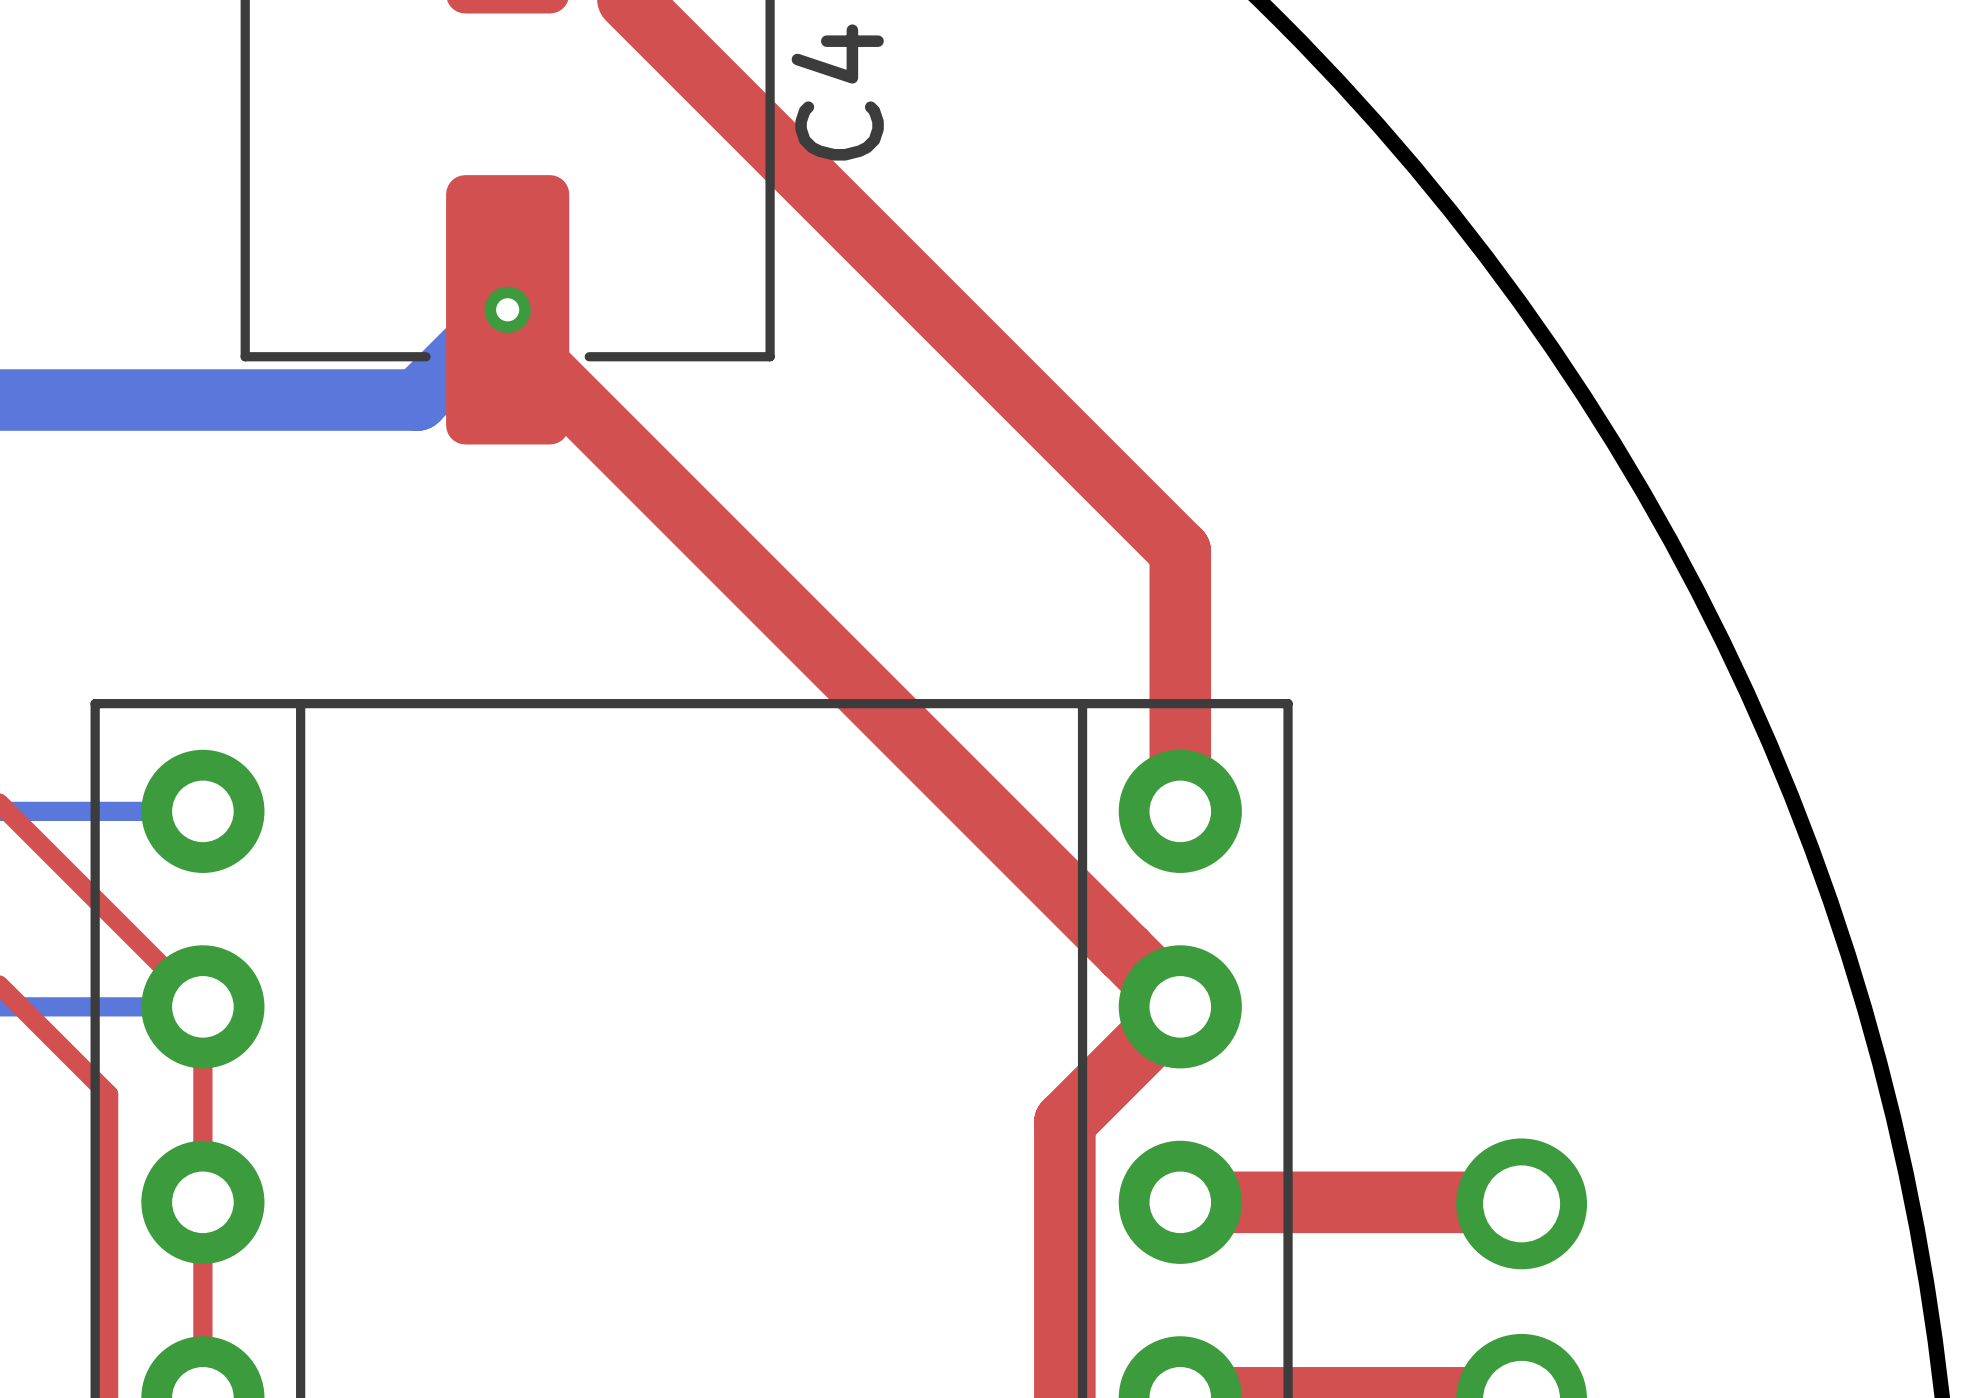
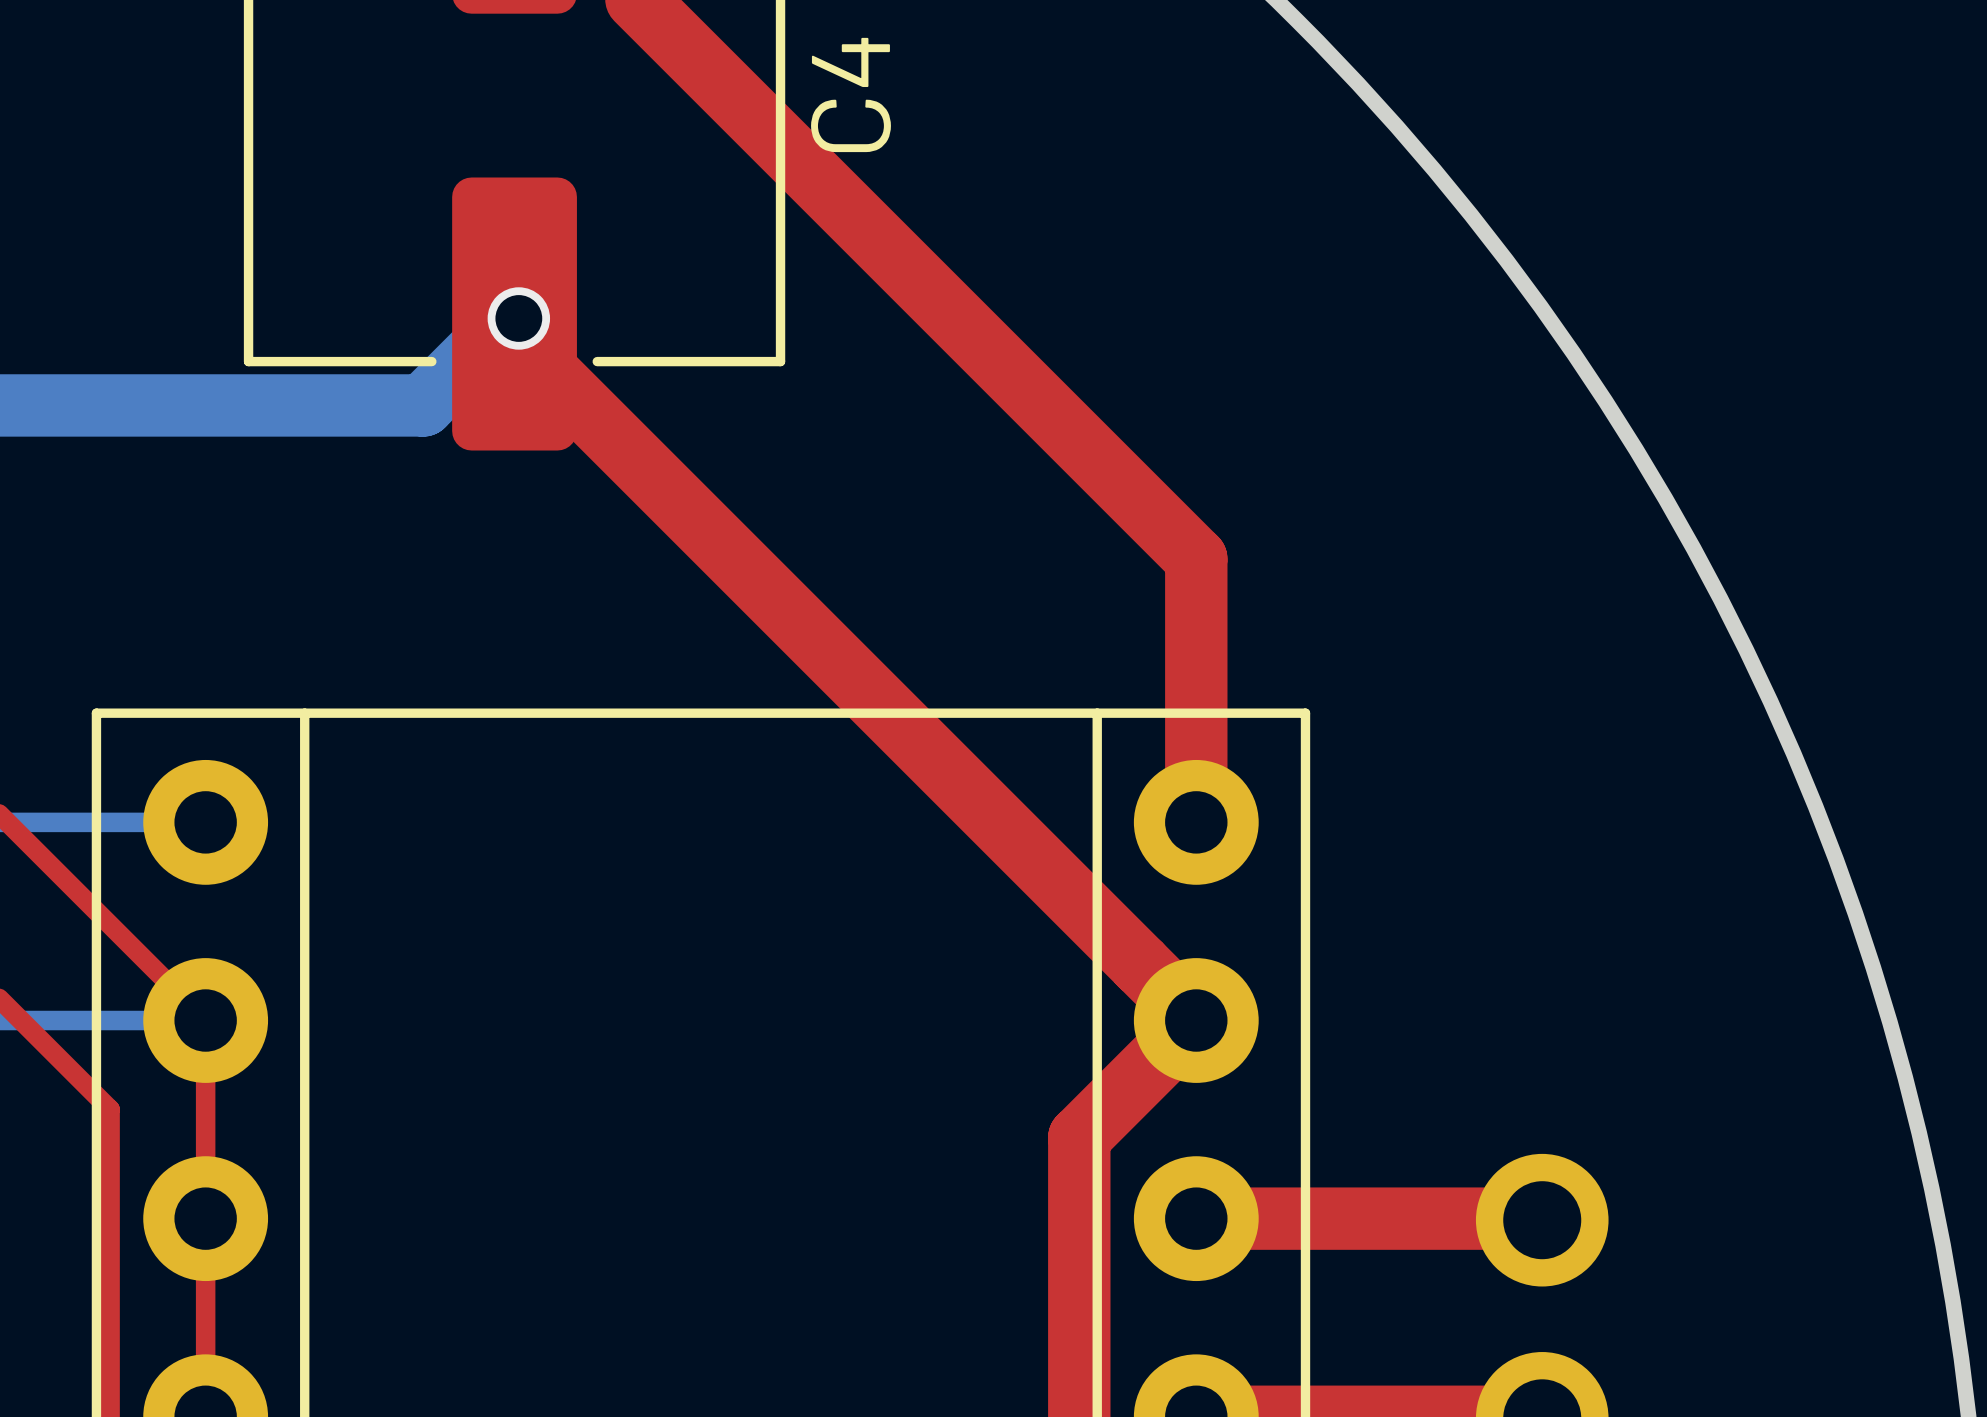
via size: [484, 286, 531, 333] -> [487, 287, 551, 350]

